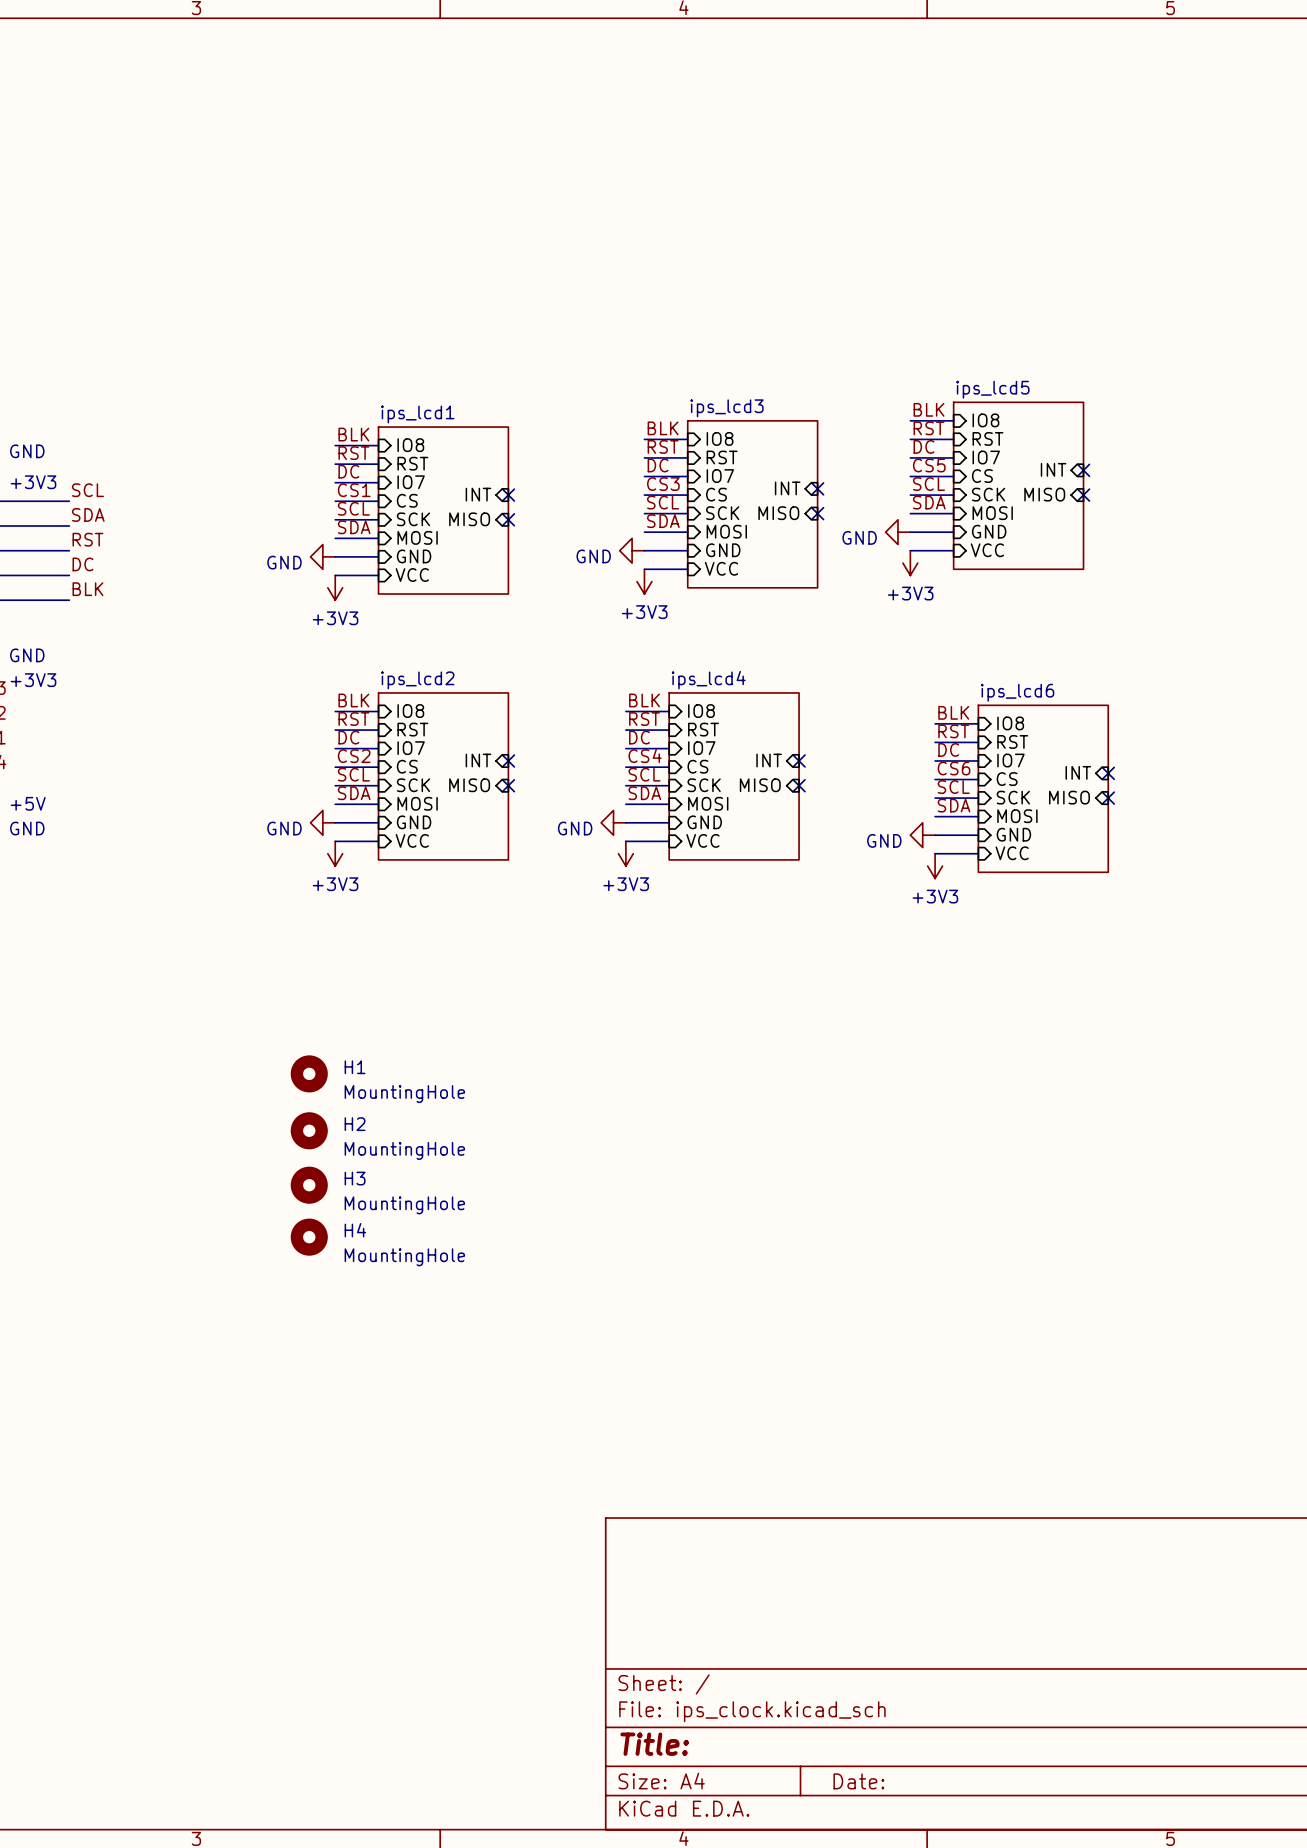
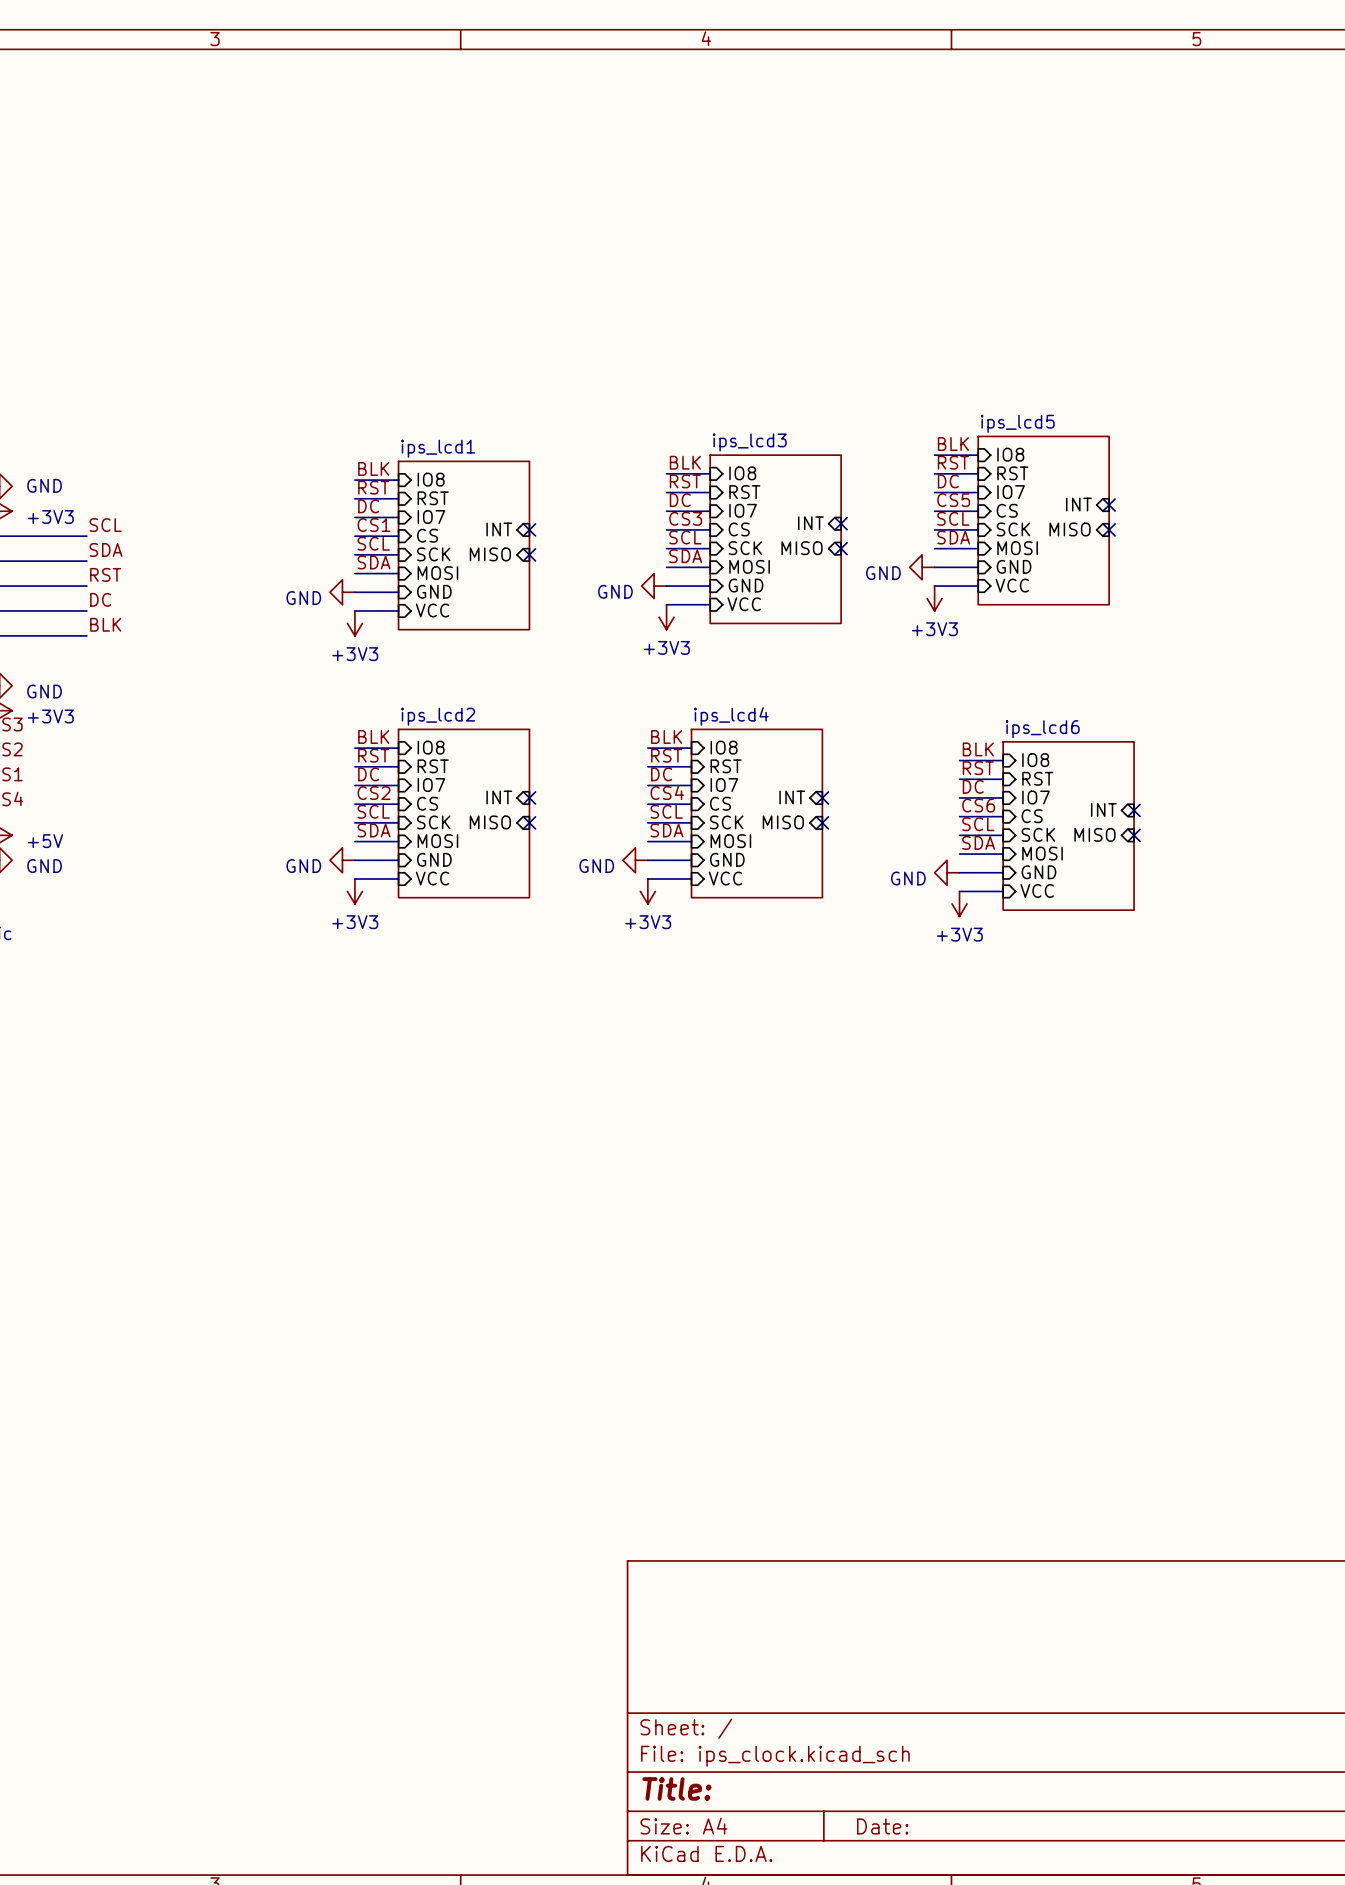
H1: MountingHole (309, 1073) -> none
H2: MountingHole (309, 1130) -> none
H3: MountingHole (309, 1185) -> none
H4: MountingHole (309, 1237) -> none

